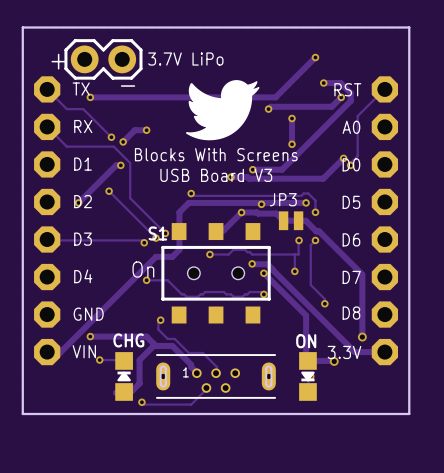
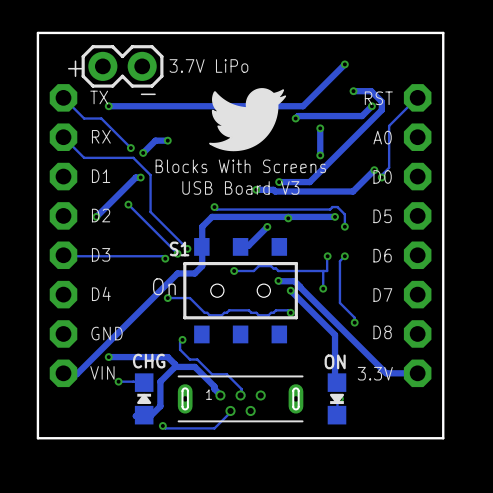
track: (241, 212) (276, 213) (283, 220) (305, 220) (316, 231) (319, 231) (362, 274) (362, 337) -> none
JP3: (291, 220) -> none
via: (362, 337) -> none
track: (307, 360) (334, 361) -> none
via: (334, 361) -> none

